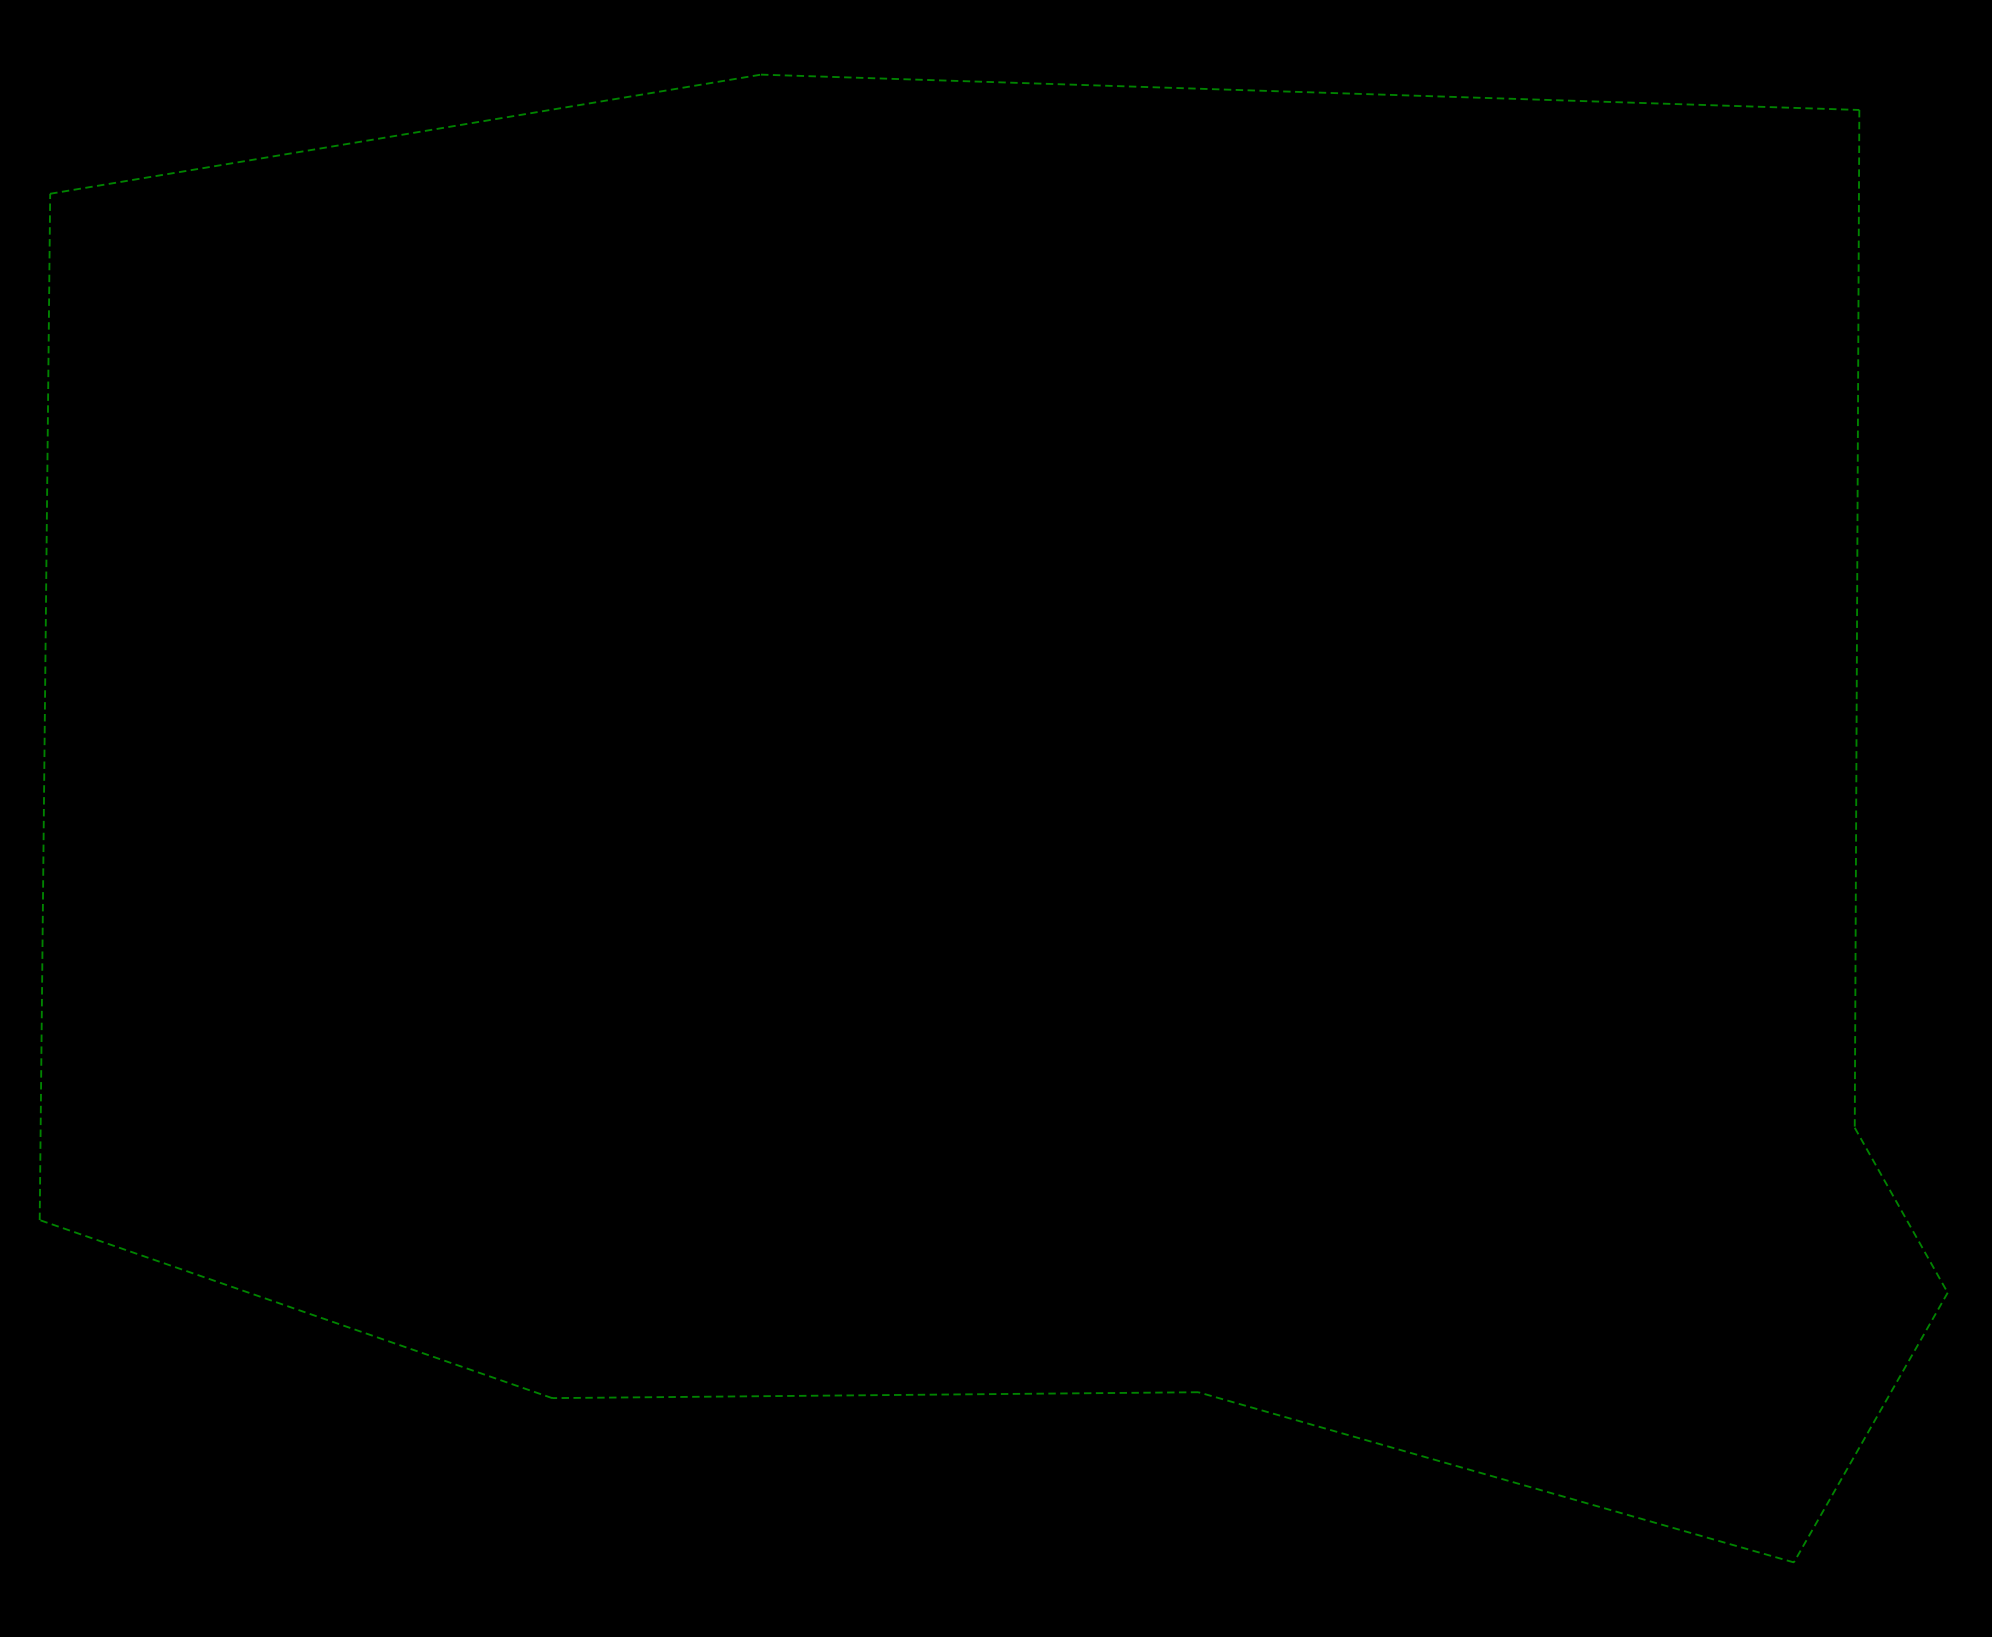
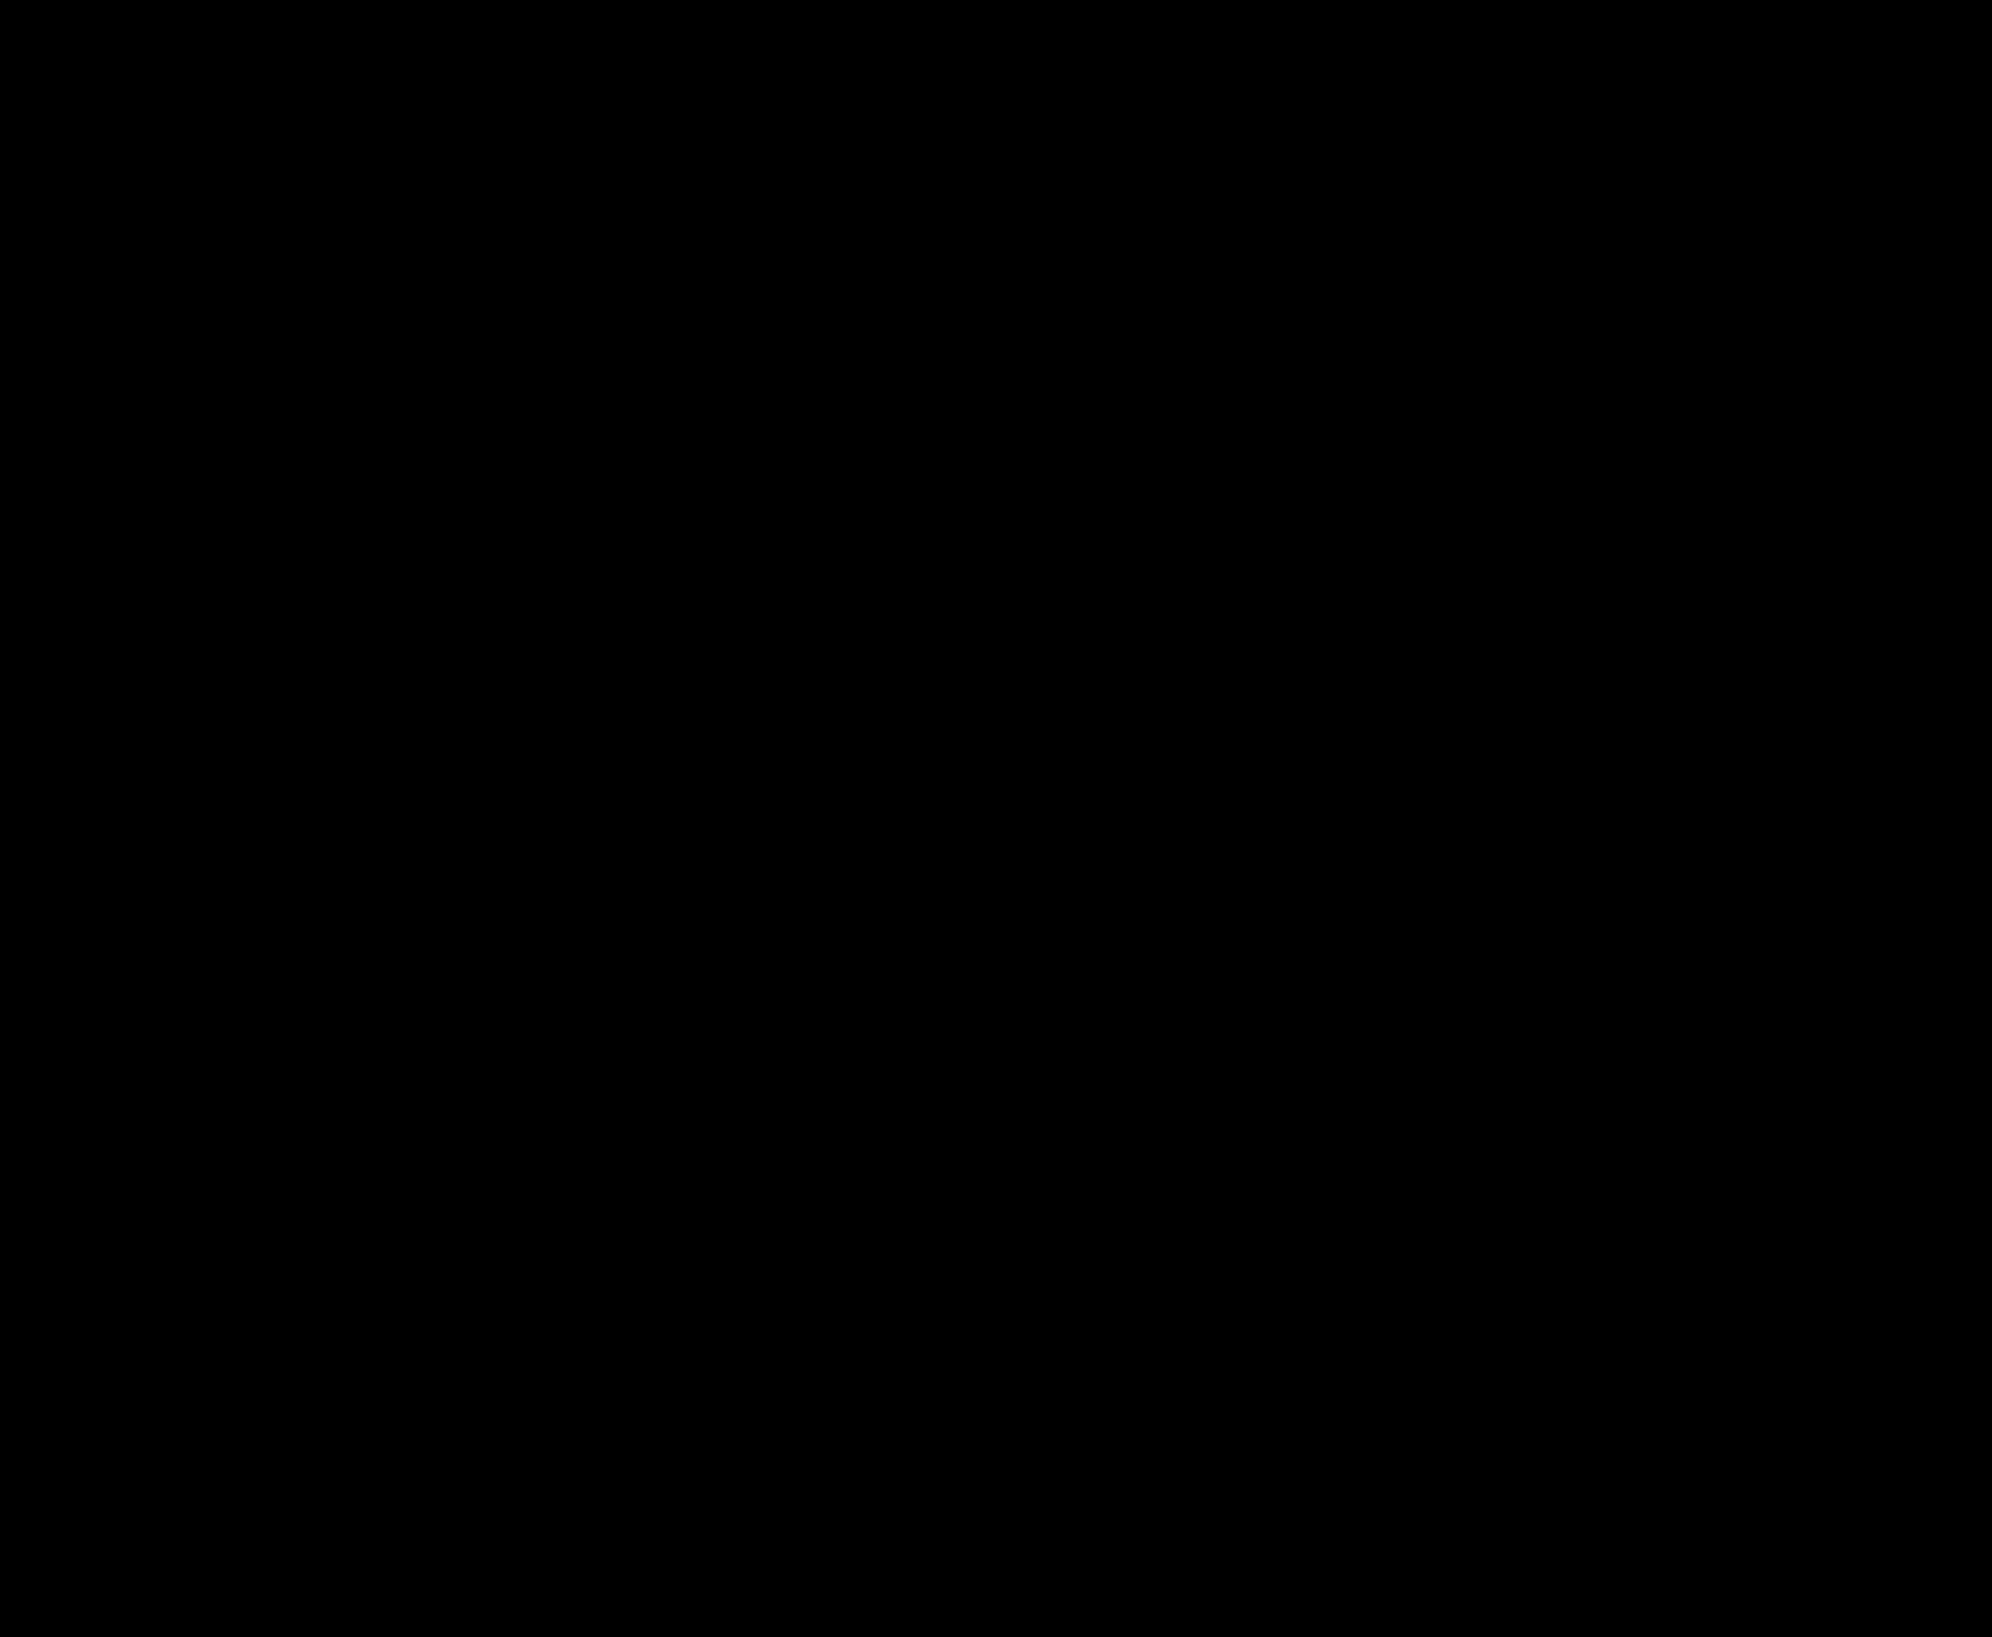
zone outline: (761, 74) (50, 193) (39, 1220) (552, 1398) (1198, 1392) (1793, 1562) (1947, 1292) (1854, 1127) (1859, 109) (761, 74) -> none

